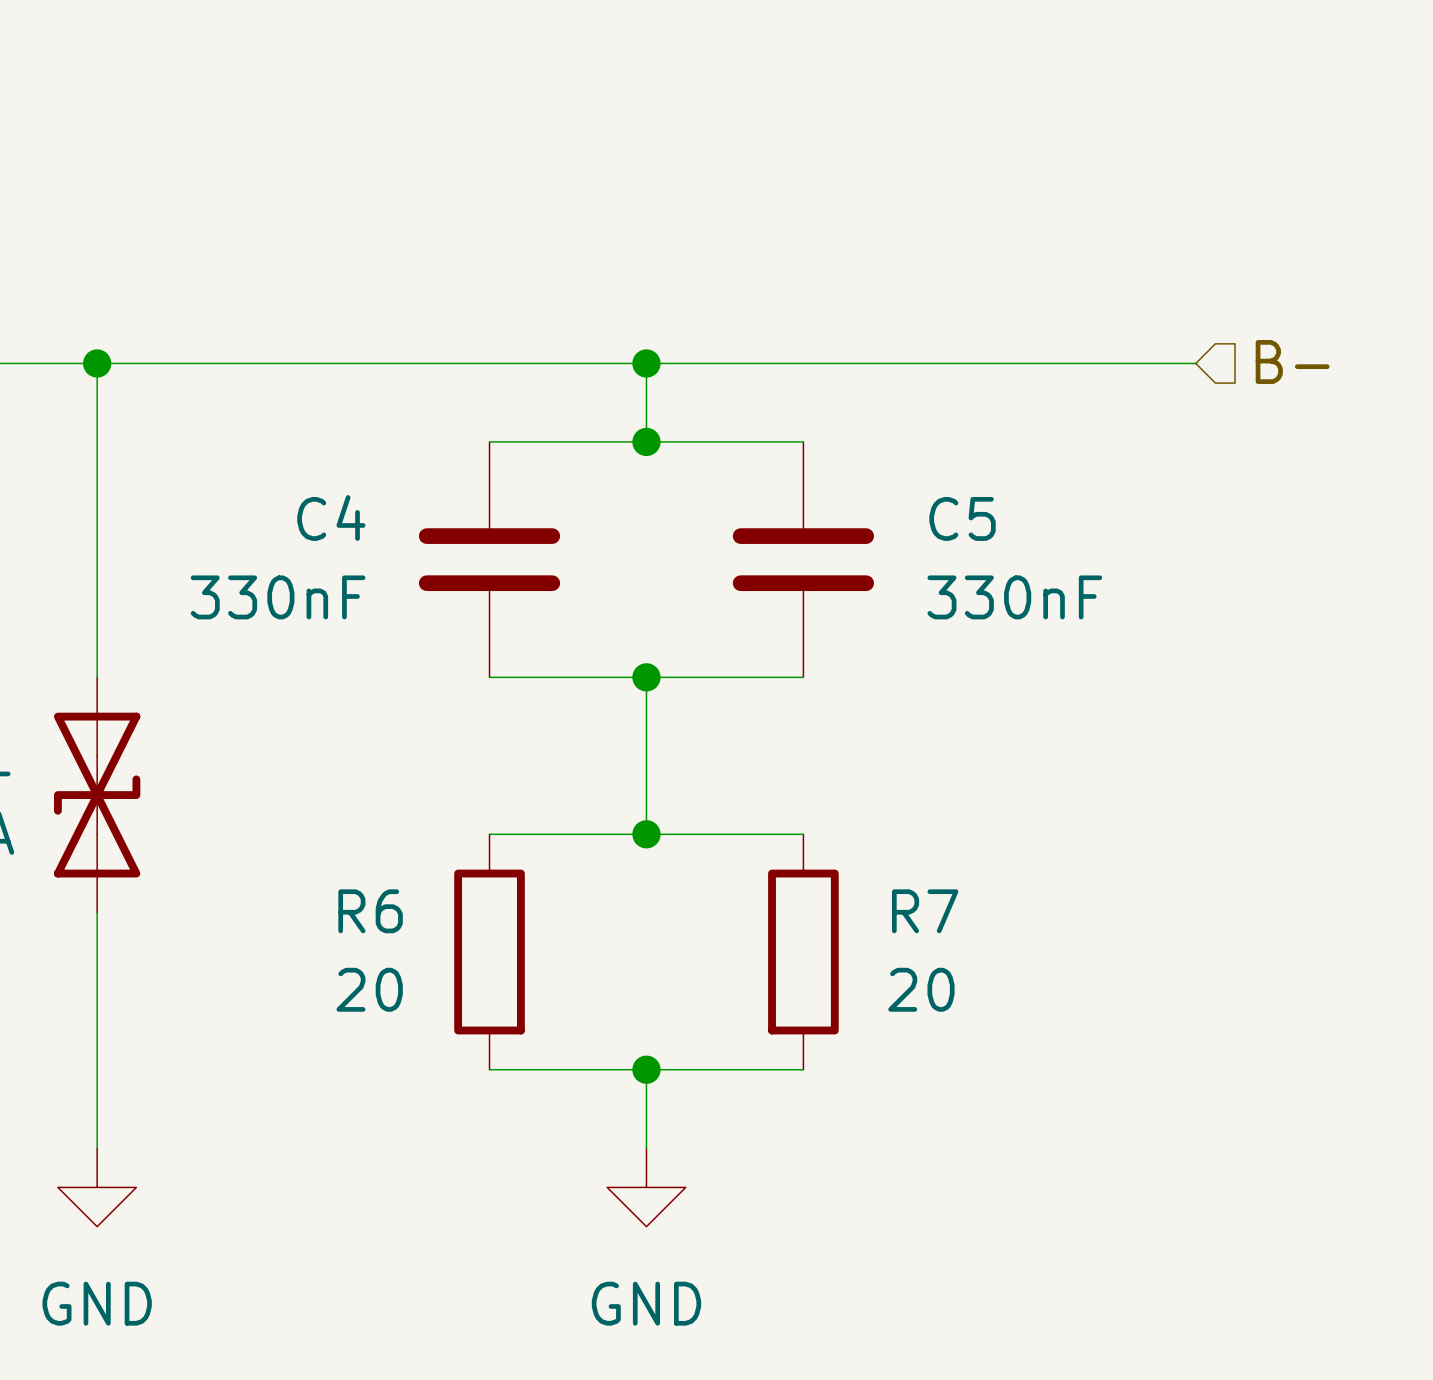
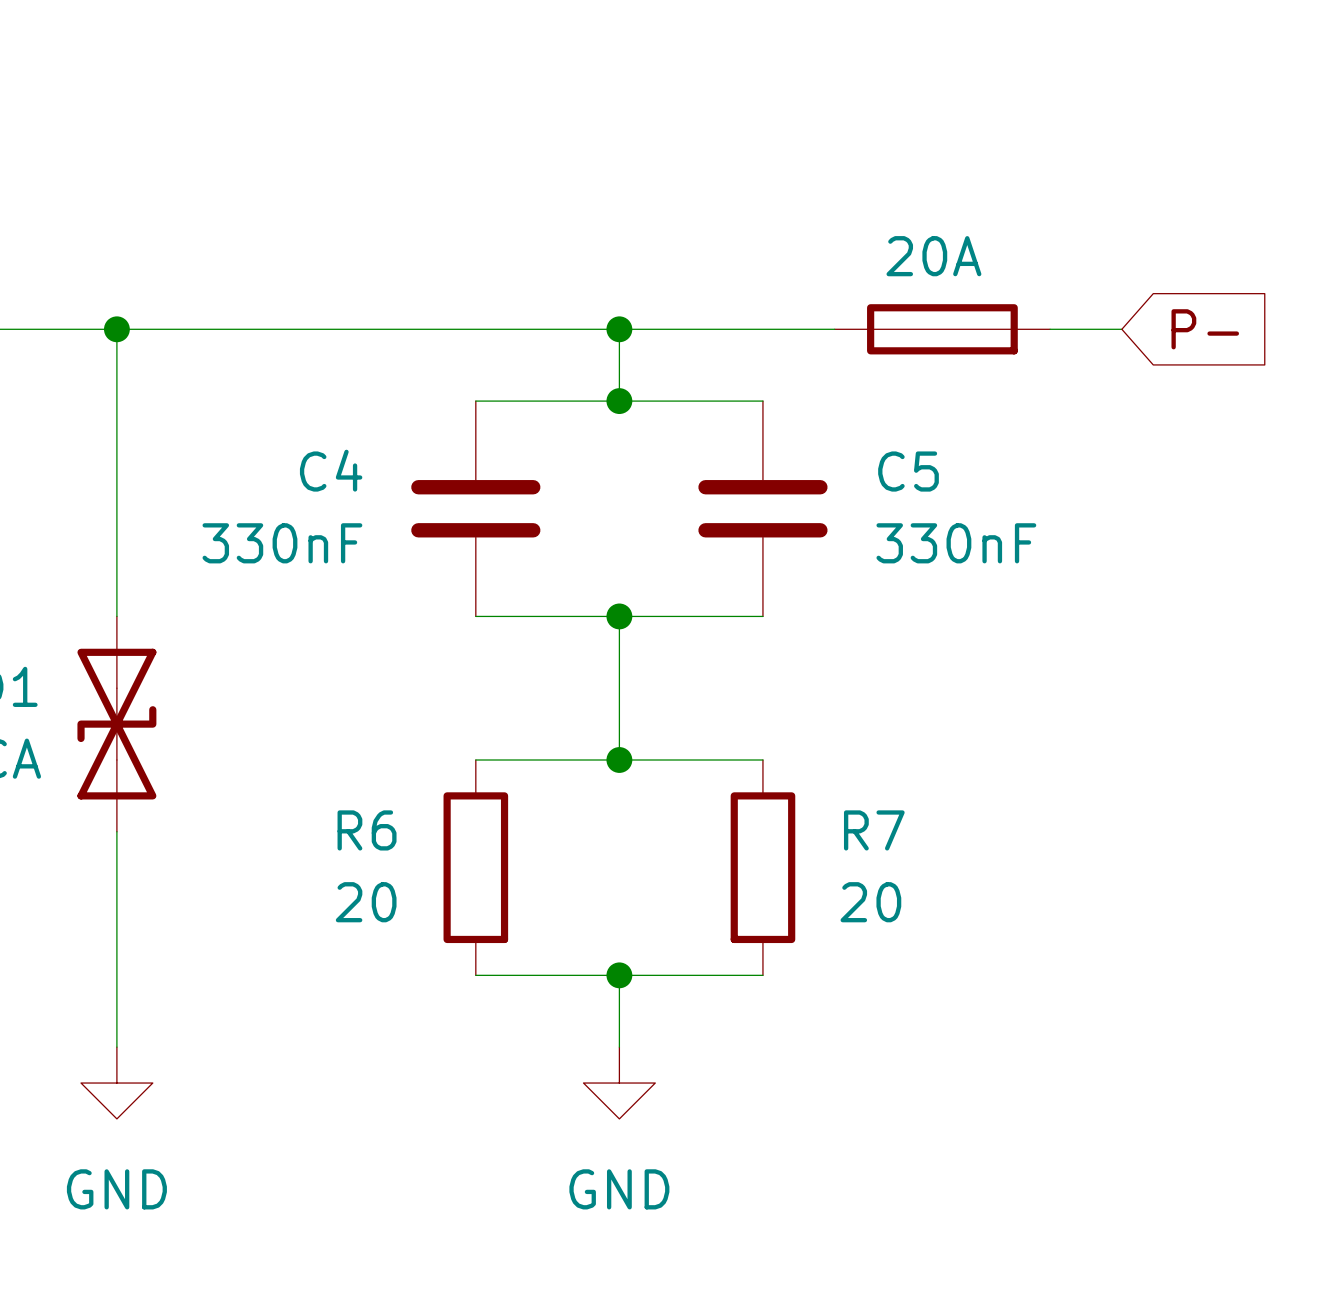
hierarchical label: B- (1292, 362) -> none
part: none -> 20A (942, 329)
global label: none -> P- (1205, 329)

